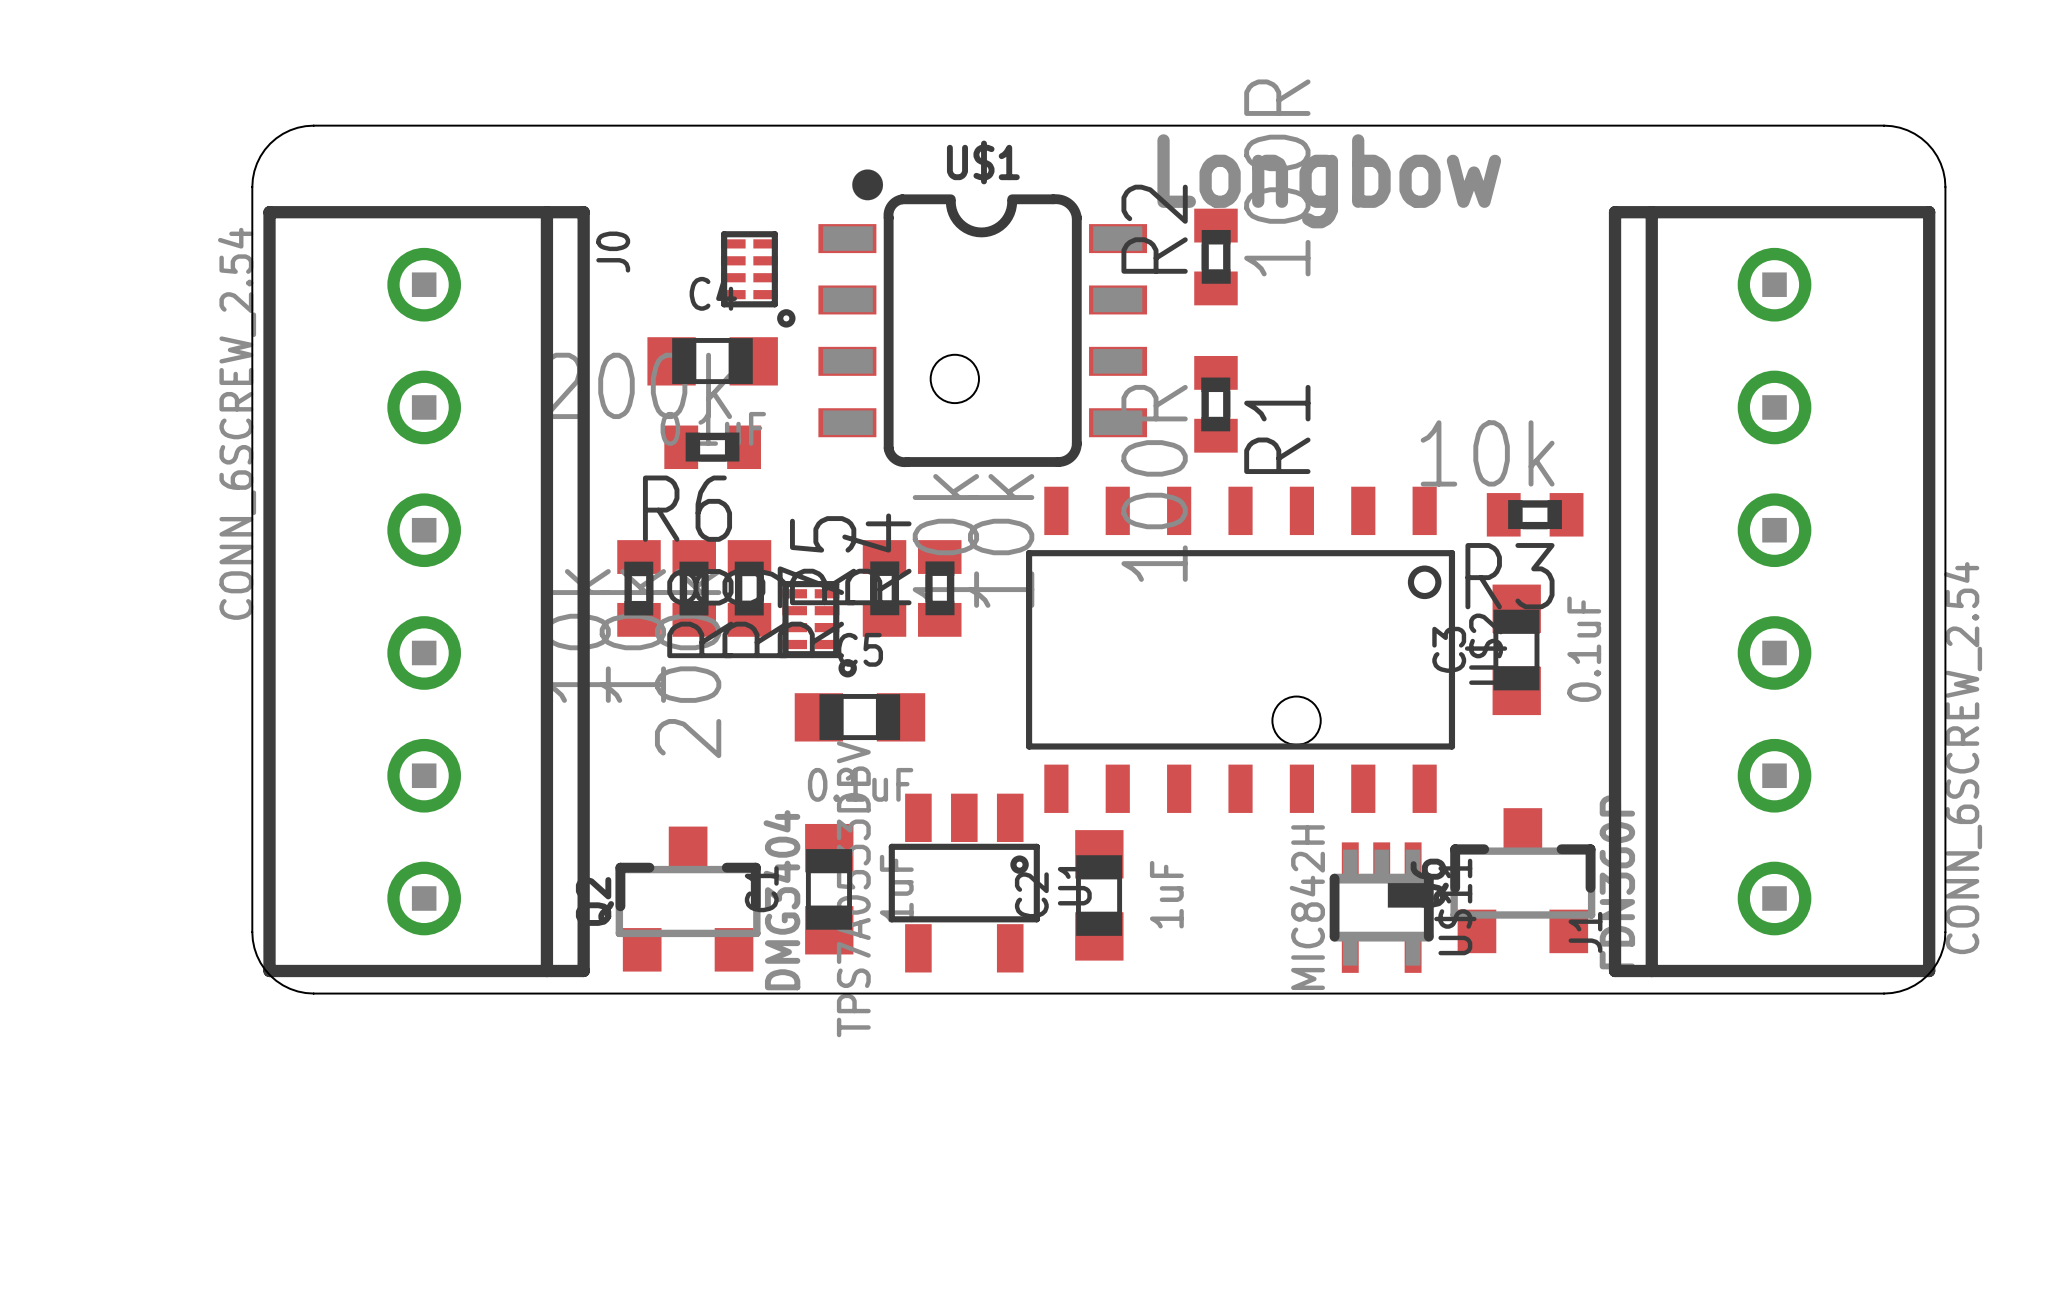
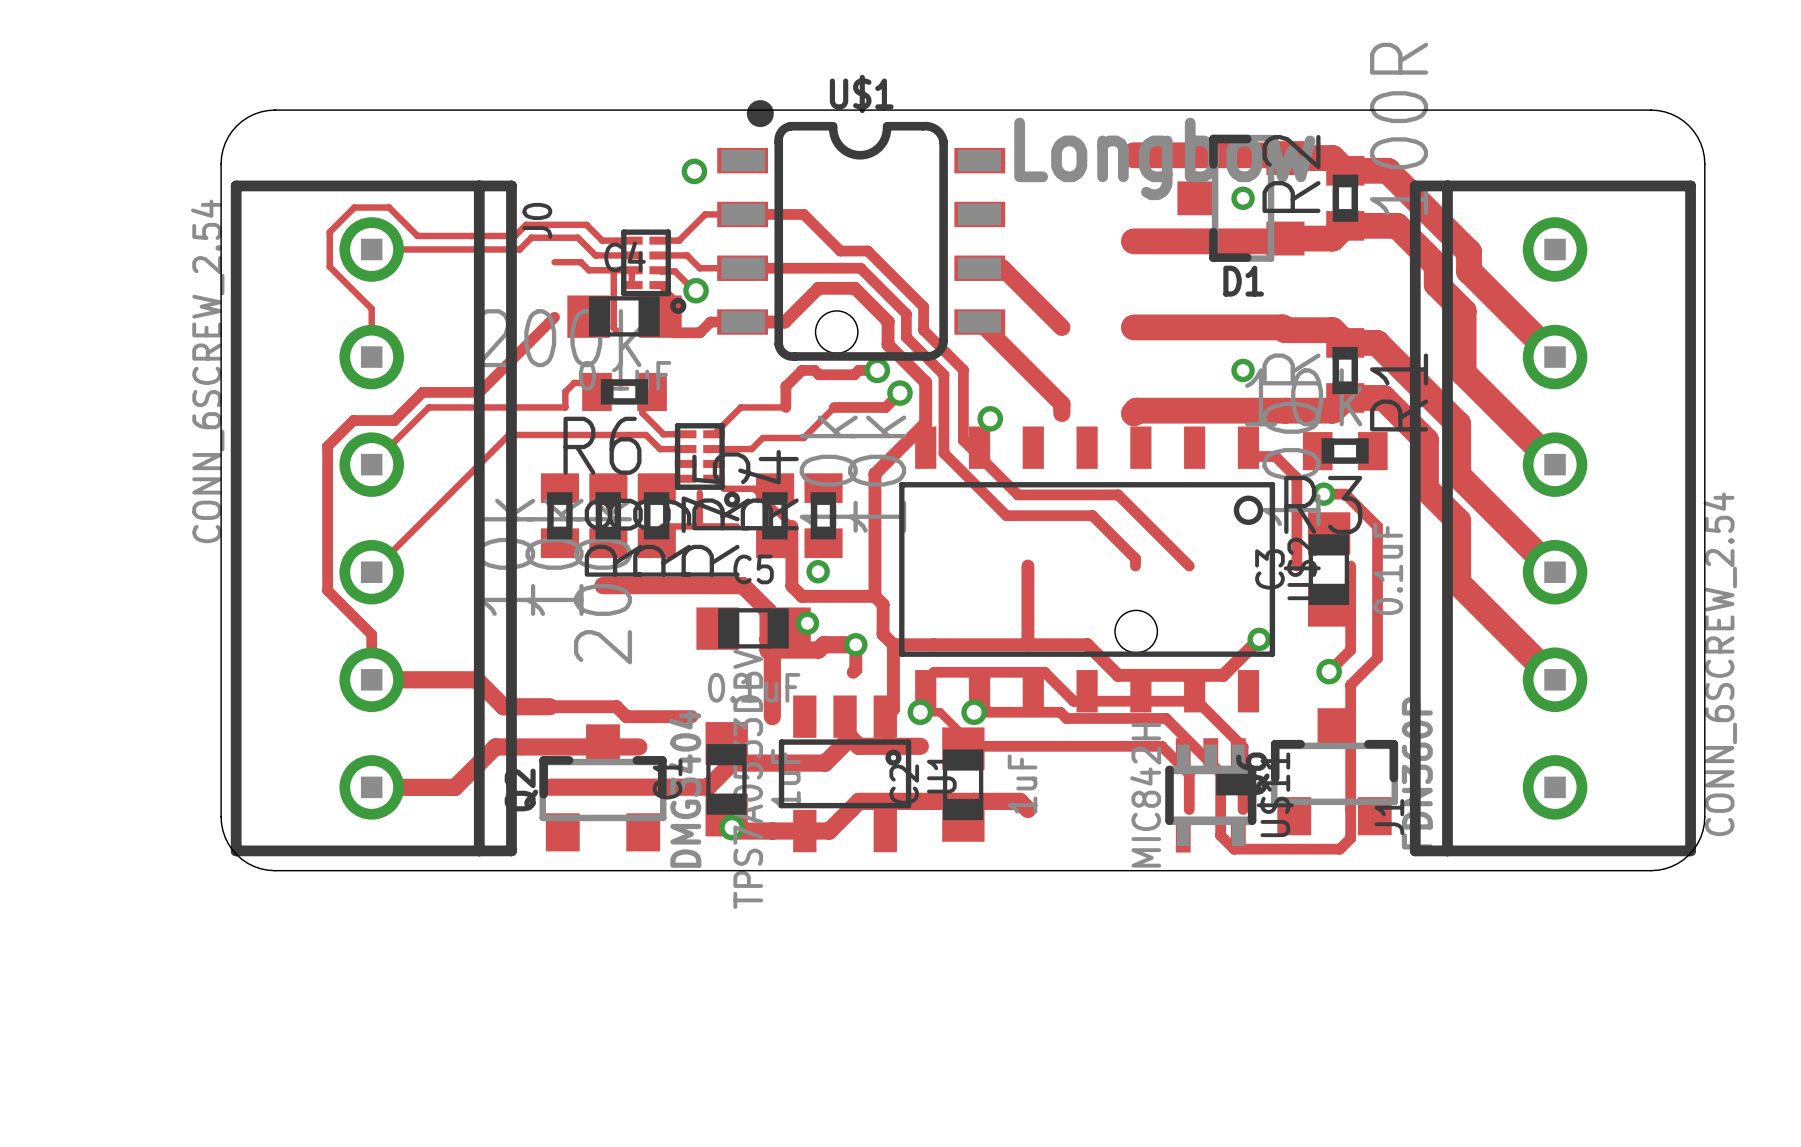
track: none -> (1133, 155) (1282, 155) (1285, 158) (1332, 158) (1345, 170) (1387, 170) (1468, 252) (1468, 271) (1555, 357)
via: none -> (694, 171)
D1: none -> (1240, 198)
via: none -> (1243, 198)
R2 position: (1215, 257) -> (1345, 198)
track: none -> (631, 240) (602, 240) (586, 224) (526, 224) (515, 235) (417, 235) (389, 207) (354, 207) (329, 232) (329, 266) (371, 308) (371, 357)
track: none -> (660, 240) (679, 240) (705, 214) (803, 214) (840, 251) (867, 251) (923, 306) (923, 330) (963, 369) (963, 440) (1017, 494) (1118, 494) (1189, 566)
track: none -> (1133, 241) (1282, 241) (1285, 238) (1332, 238) (1345, 225) (1397, 225) (1436, 265) (1436, 284) (1463, 311) (1463, 373) (1555, 464)
part position: (758, 279) -> (653, 271)
track: none -> (371, 249) (519, 249) (531, 237) (577, 237) (595, 255) (631, 255)
track: none -> (660, 255) (687, 255) (699, 268) (860, 268) (906, 313) (906, 337) (943, 374) (943, 453) (1006, 515) (1092, 515) (1135, 558) (1135, 566)
track: none -> (554, 262) (580, 262) (588, 270) (631, 270) (631, 285)
track: none -> (979, 268) (1002, 268) (1061, 327)
track: none -> (613, 270) (613, 328) (618, 332)
track: none -> (660, 270) (675, 271) (696, 290)
U$1 position: (982, 318) -> (861, 230)
track: none -> (660, 285) (673, 298) (673, 332) (699, 332) (710, 322) (784, 322) (818, 288) (854, 288) (888, 321) (888, 344) (925, 382) (925, 423) (874, 473) (874, 596)
via: none -> (696, 290)
track: none -> (554, 317) (479, 392) (422, 392) (394, 420) (353, 420) (327, 446) (327, 590) (371, 634) (371, 679) (476, 679) (503, 706) (616, 706) (626, 716) (691, 716)
track: none -> (979, 322) (1061, 404) (1061, 413)
track: none -> (1133, 327) (1282, 327) (1285, 330) (1332, 330) (1345, 342) (1376, 342) (1458, 424) (1458, 475) (1555, 572)
R1 position: (1215, 404) -> (1345, 370)
track: none -> (877, 370) (858, 370) (854, 374) (819, 374) (814, 370) (802, 370) (785, 386) (785, 407) (740, 407) (714, 434)
via: none -> (877, 370)
via: none -> (1243, 370)
track: none -> (899, 393) (885, 407) (834, 407) (803, 438) (762, 438) (751, 449) (714, 449)
via: none -> (899, 393)
track: none -> (1133, 413) (1136, 410) (1332, 410) (1345, 397) (1383, 397) (1425, 440) (1425, 488) (1458, 521) (1458, 582) (1555, 679)
via: none -> (990, 418)
track: none -> (685, 434) (663, 434) (642, 413) (642, 388) (636, 382) (574, 382) (565, 391) (565, 407) (428, 407) (371, 464)
track: none -> (685, 449) (660, 449) (646, 434) (508, 434) (371, 572)
track: none -> (1259, 456) (1275, 456) (1296, 478) (1296, 566)
track: none -> (714, 478) (724, 488) (754, 488) (791, 526) (791, 586) (802, 596) (874, 596)
track: none -> (699, 492) (699, 526)
track: none -> (1323, 494) (1345, 494) (1377, 526) (1377, 658) (1350, 684) (1350, 838) (1339, 849) (1234, 849) (1220, 835) (1220, 773) (1166, 718) (1066, 718) (1060, 712) (974, 712)
via: none -> (1323, 494)
track: none -> (662, 526) (736, 526)
part position: (819, 629) -> (707, 465)
track: none -> (1027, 566) (1027, 644)
track: none -> (1350, 566) (1350, 650) (1329, 671)
via: none -> (818, 571)
track: none -> (603, 585) (742, 585) (768, 610) (768, 650) (772, 654) (772, 716)
track: none -> (874, 596) (883, 604) (883, 634) (893, 644)
via: none -> (807, 623)
track: none -> (768, 639) (778, 650) (818, 650) (823, 644) (855, 644) (855, 669) (853, 672)
track: none -> (1259, 639) (1223, 675) (1118, 675) (1087, 644) (893, 644)
via: none -> (1259, 639)
via: none -> (855, 644)
track: none -> (893, 644) (893, 709) (888, 714) (888, 746)
via: none -> (1329, 671)
track: none -> (933, 672) (1044, 672) (1073, 701) (1197, 701) (1243, 746) (1243, 809)
track: none -> (920, 712) (940, 712) (974, 746) (1161, 746) (1189, 773) (1189, 809)
via: none -> (920, 712)
via: none -> (974, 712)
track: none -> (920, 746) (858, 746) (850, 737) (825, 763) (732, 763) (707, 787) (549, 787)
track: none -> (638, 746) (495, 746) (455, 787) (371, 787)
track: none -> (1027, 809) (1019, 801) (858, 801) (829, 831) (735, 831) (732, 827)
via: none -> (732, 827)

